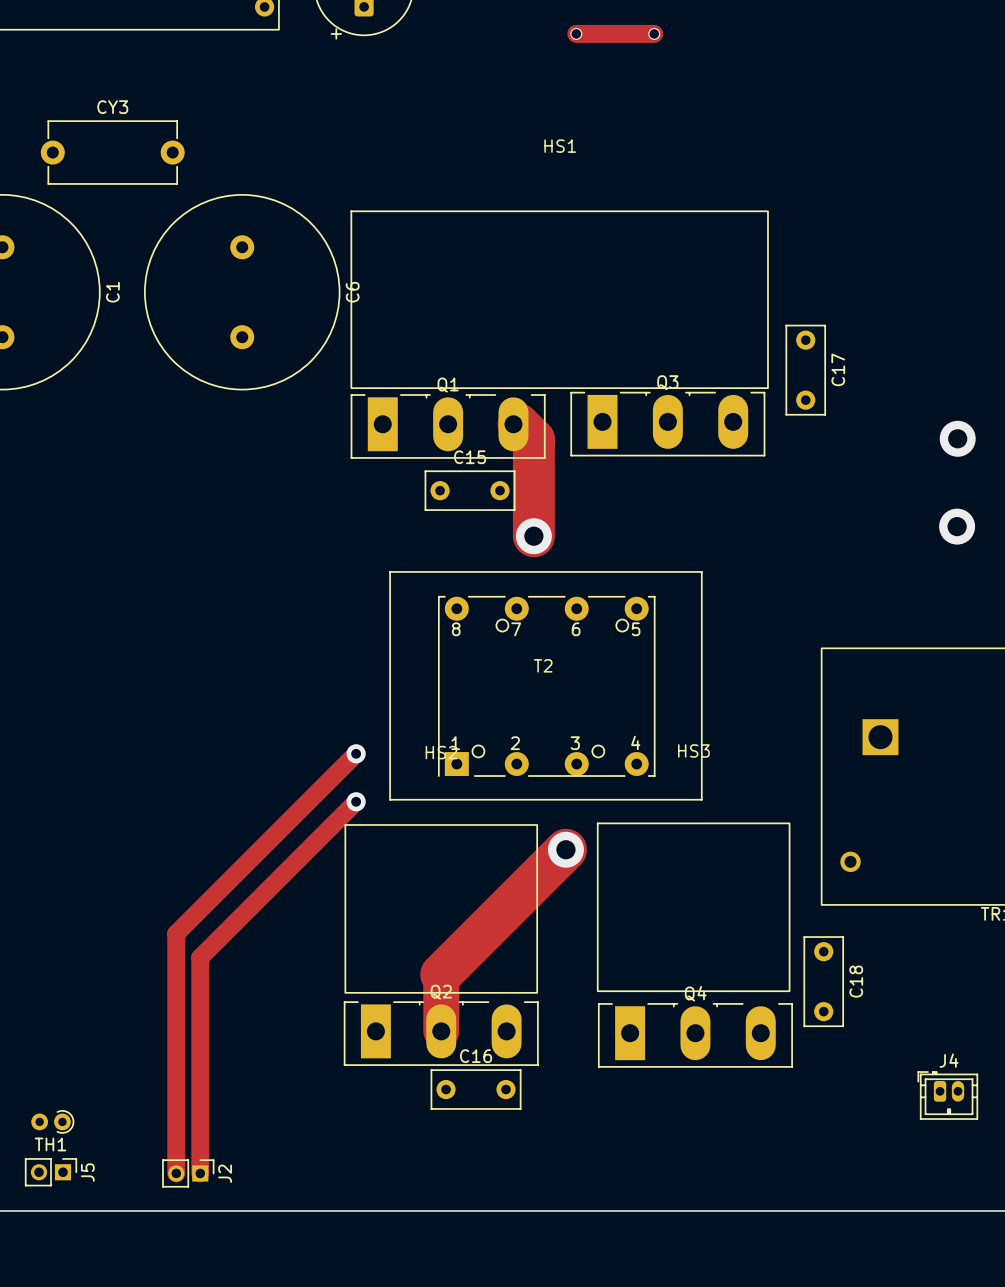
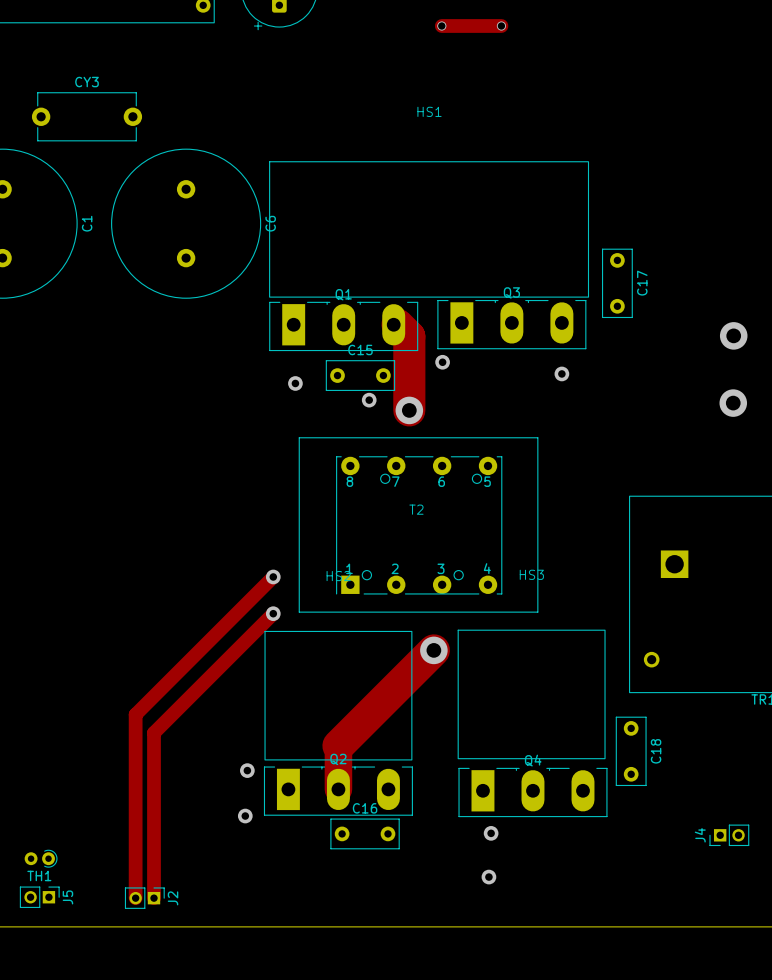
via: none -> (442, 362)
via: none -> (561, 373)
via: none -> (295, 383)
via: none -> (369, 400)
via: none -> (247, 770)
J4 name position: J4 (949, 1060) -> J4 (700, 835)
via: none -> (245, 816)
J4 footprint: [917, 1071, 979, 1120] -> [709, 824, 750, 847]
via: none -> (491, 833)
via: none -> (488, 877)

